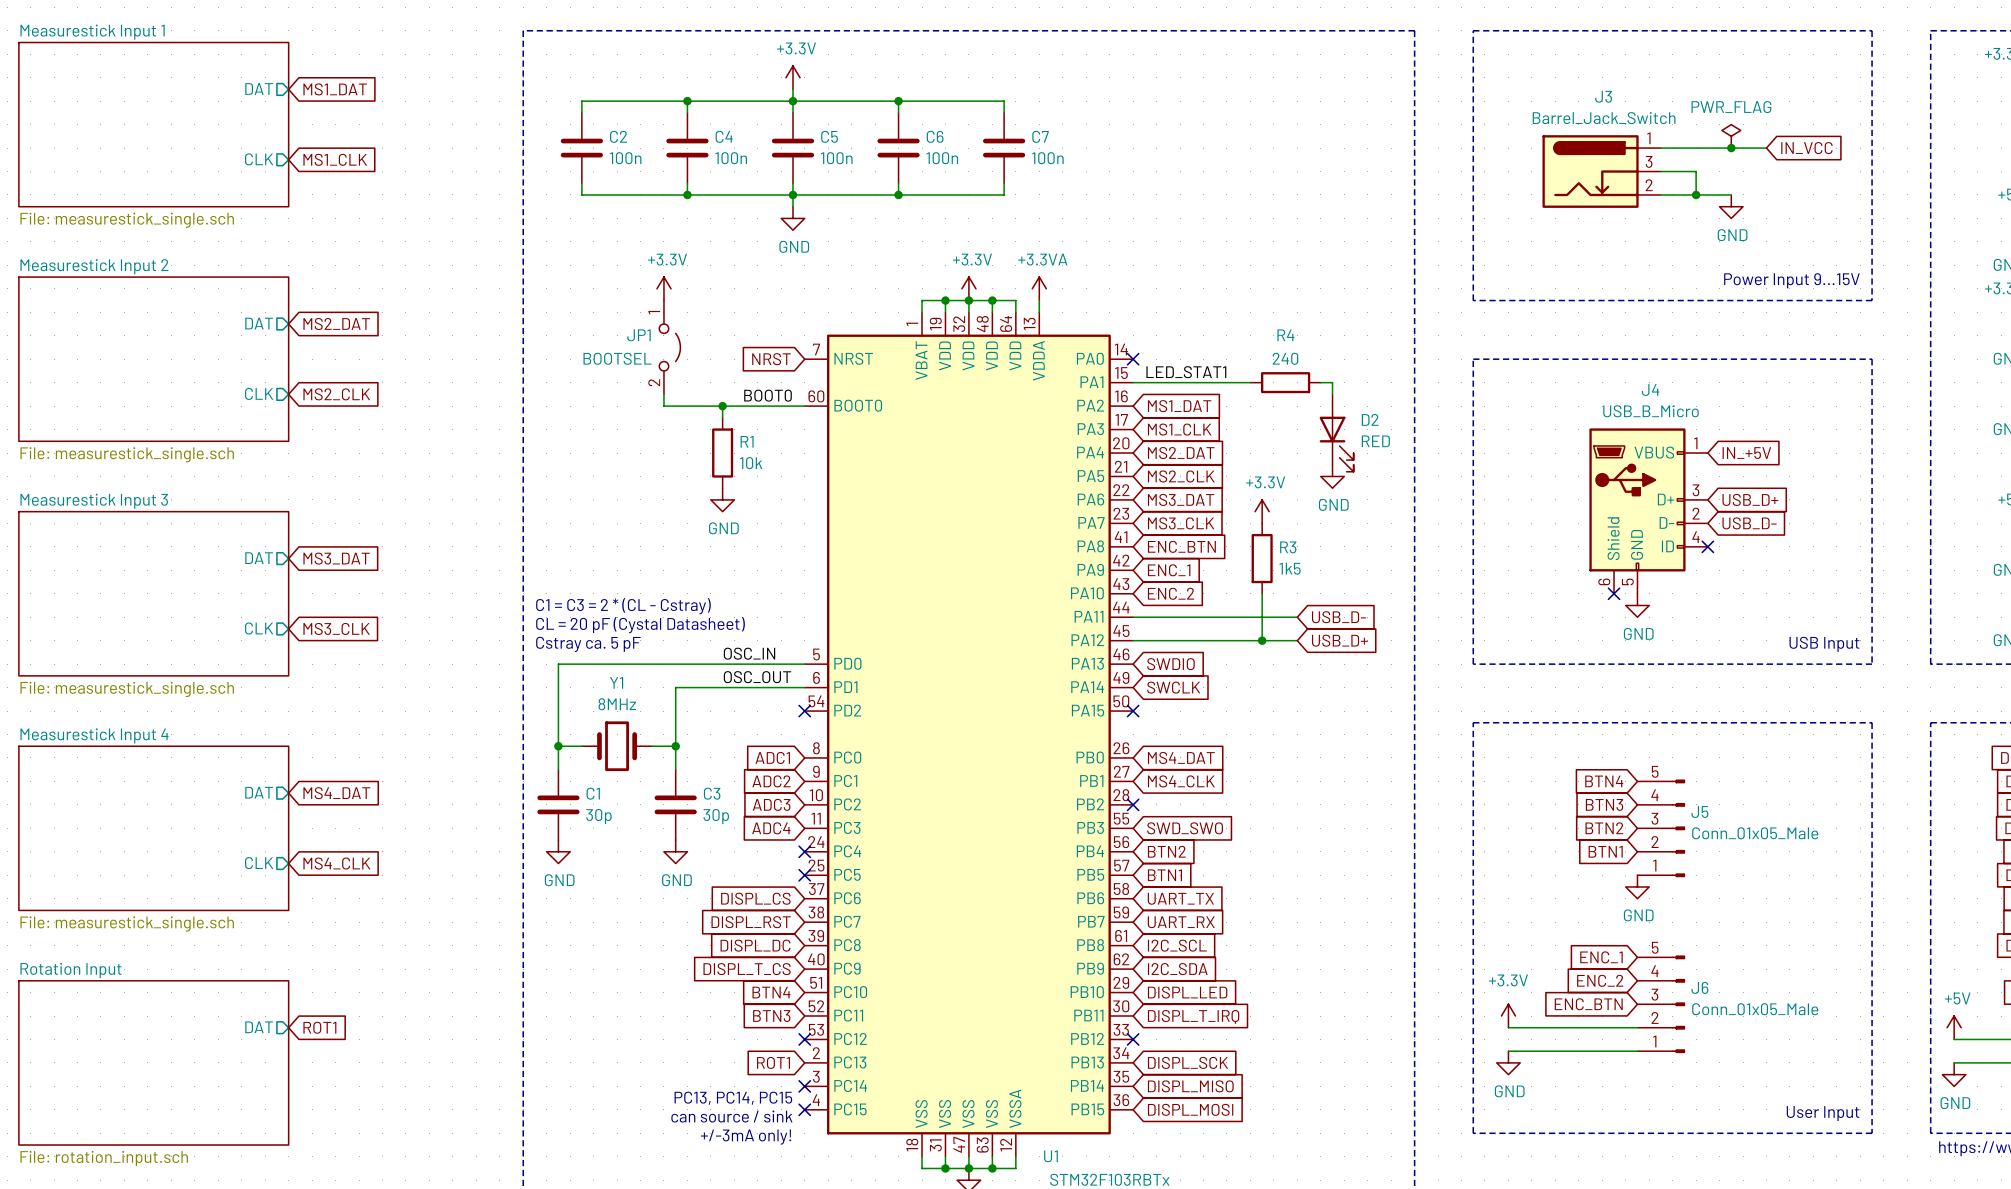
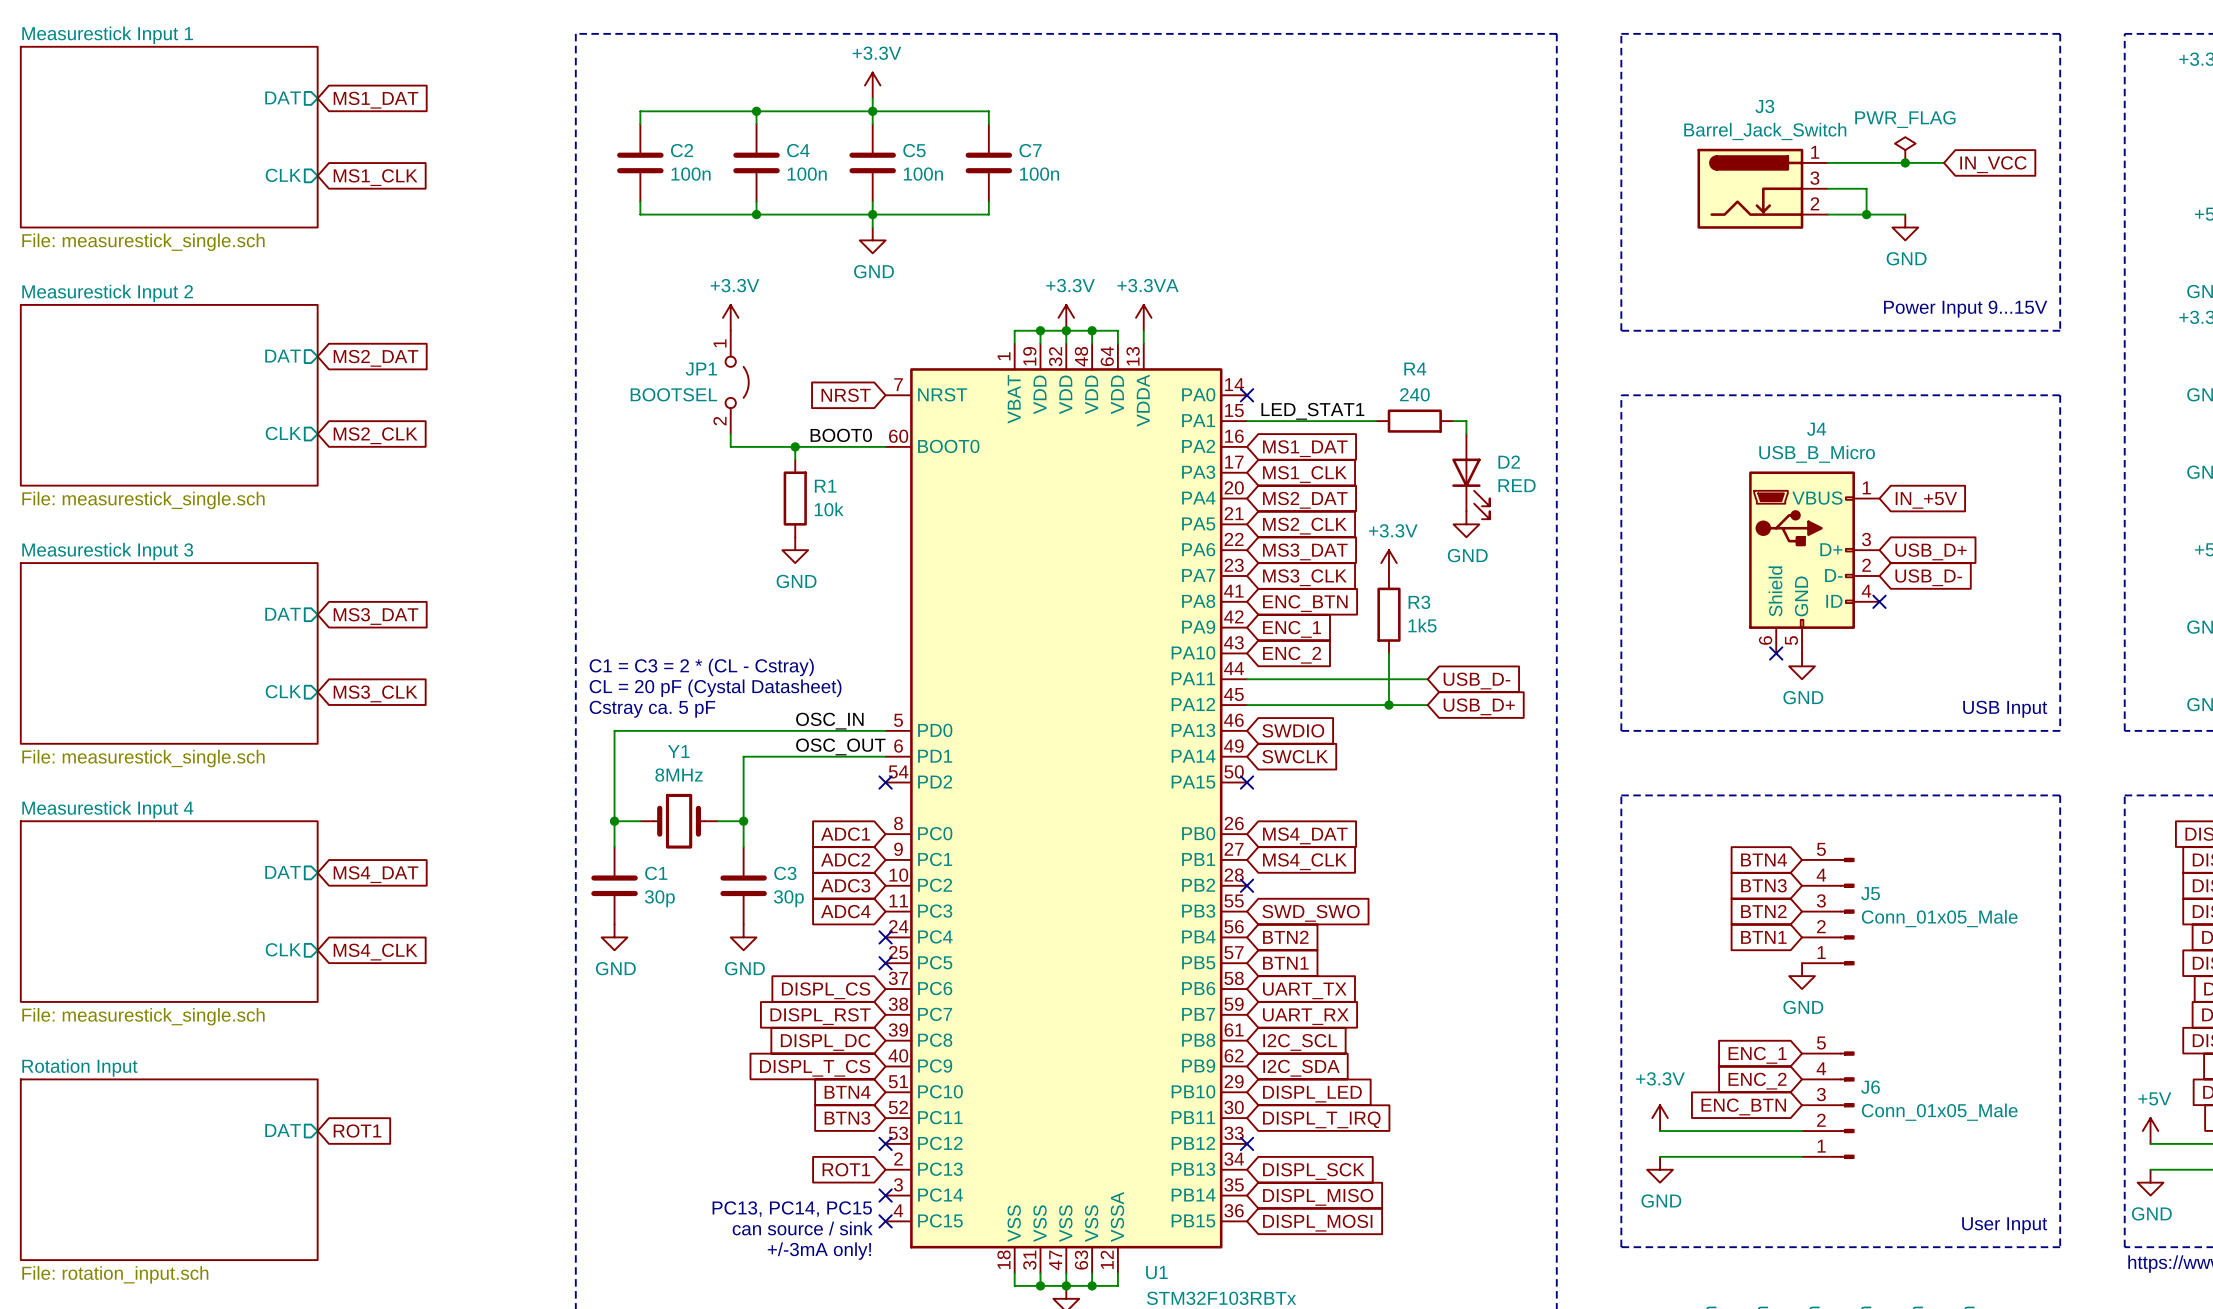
wire: (898, 101) (1004, 101) (1004, 112) -> none
junction: (898, 101) -> none
C6 name: C6 (935, 136) -> C7 (1030, 150)
C7: 100n (1004, 148) -> none
wire: (1004, 183) (1004, 194) (898, 194) -> none
junction: (898, 194) -> none

